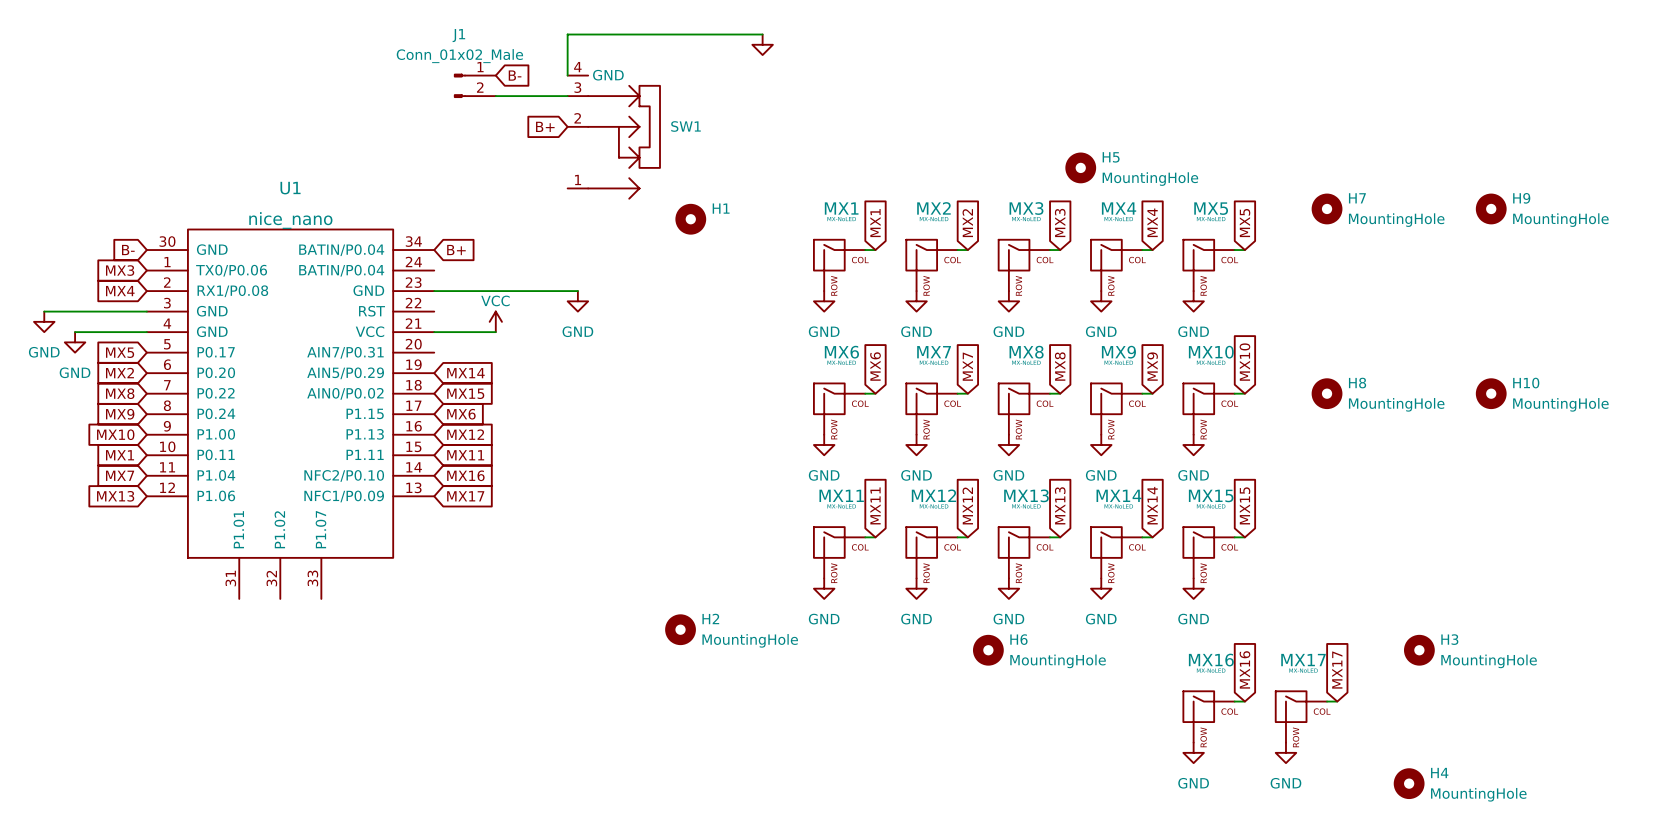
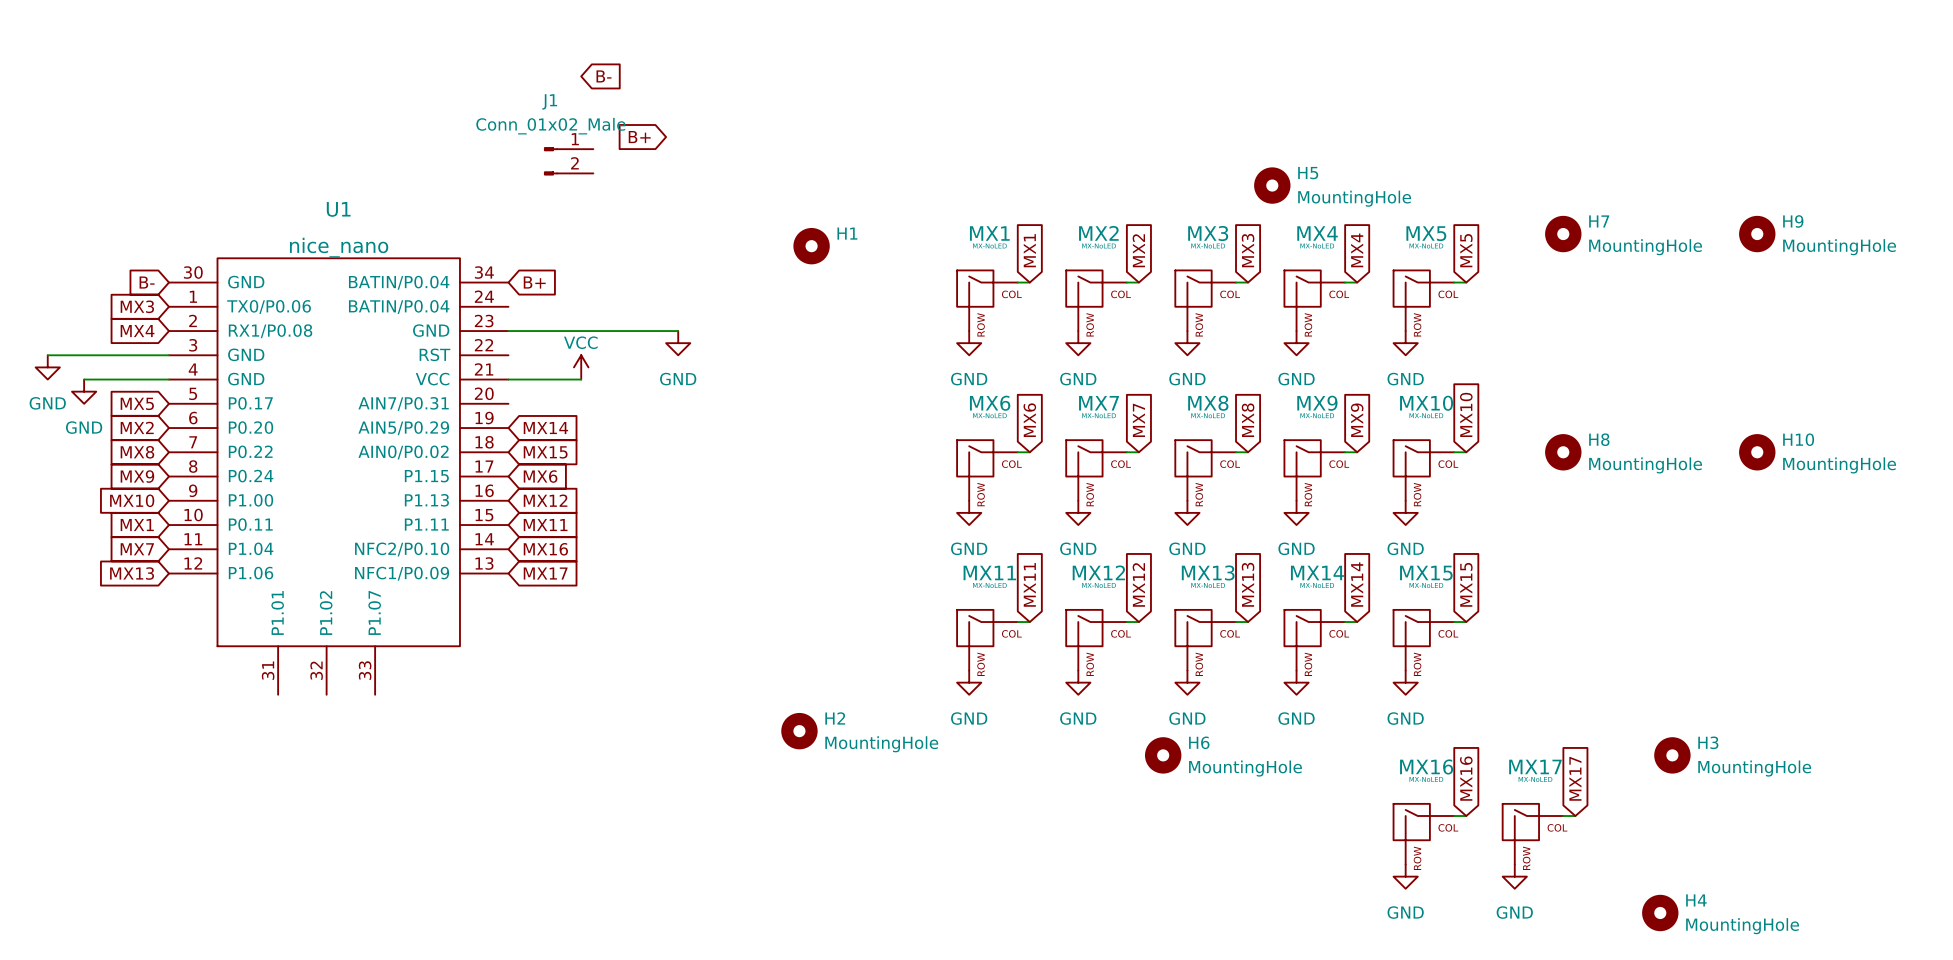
wire: (762, 34) (567, 34) (567, 75) -> none
power symbol: (762, 44) -> none
J1 position: (474, 85) -> (568, 161)
wire: (495, 96) (567, 96) -> none
SW1: (613, 137) -> none

